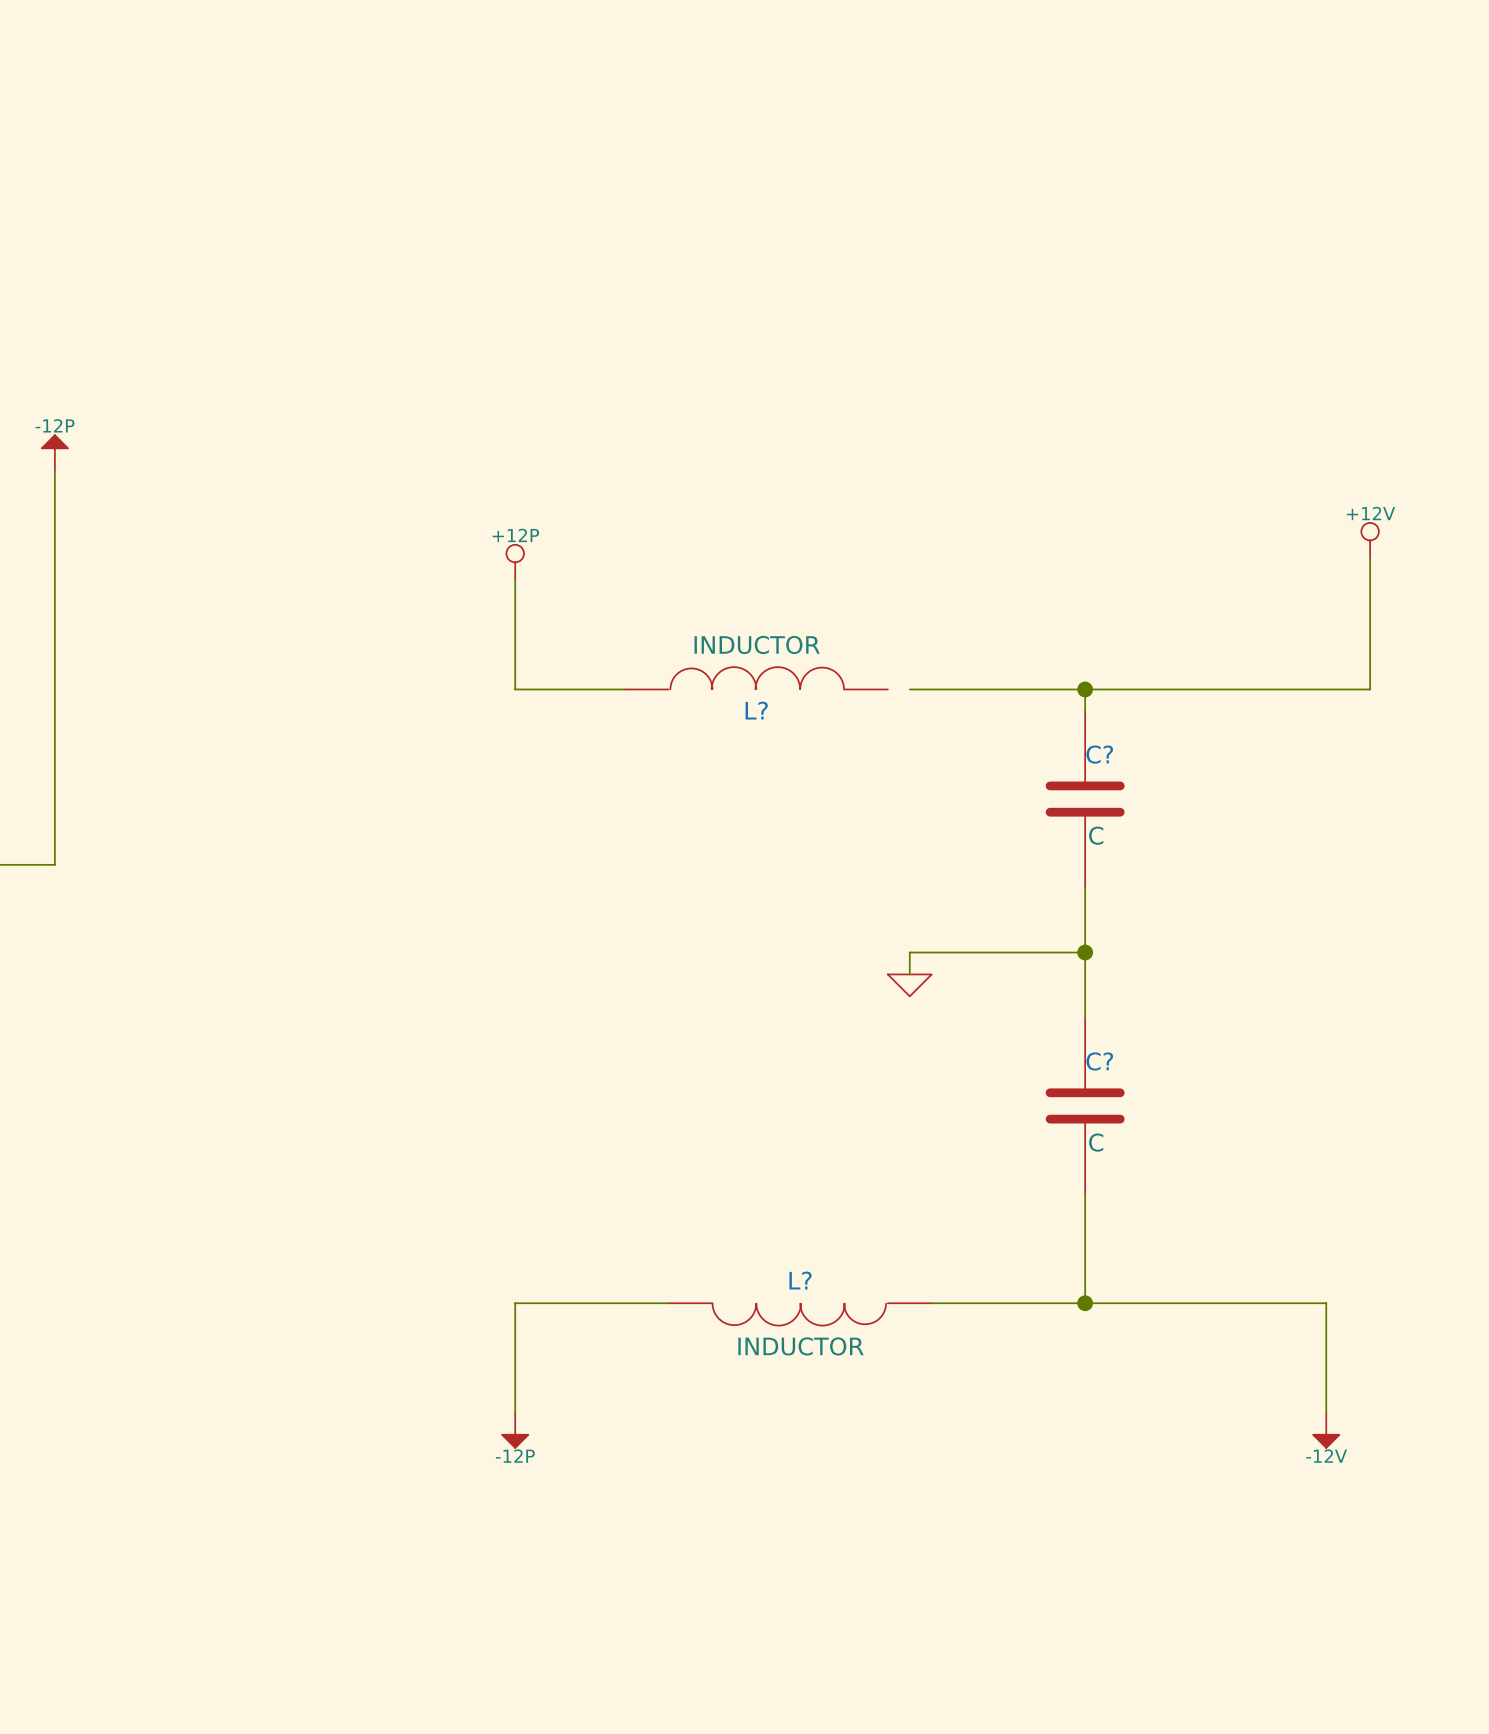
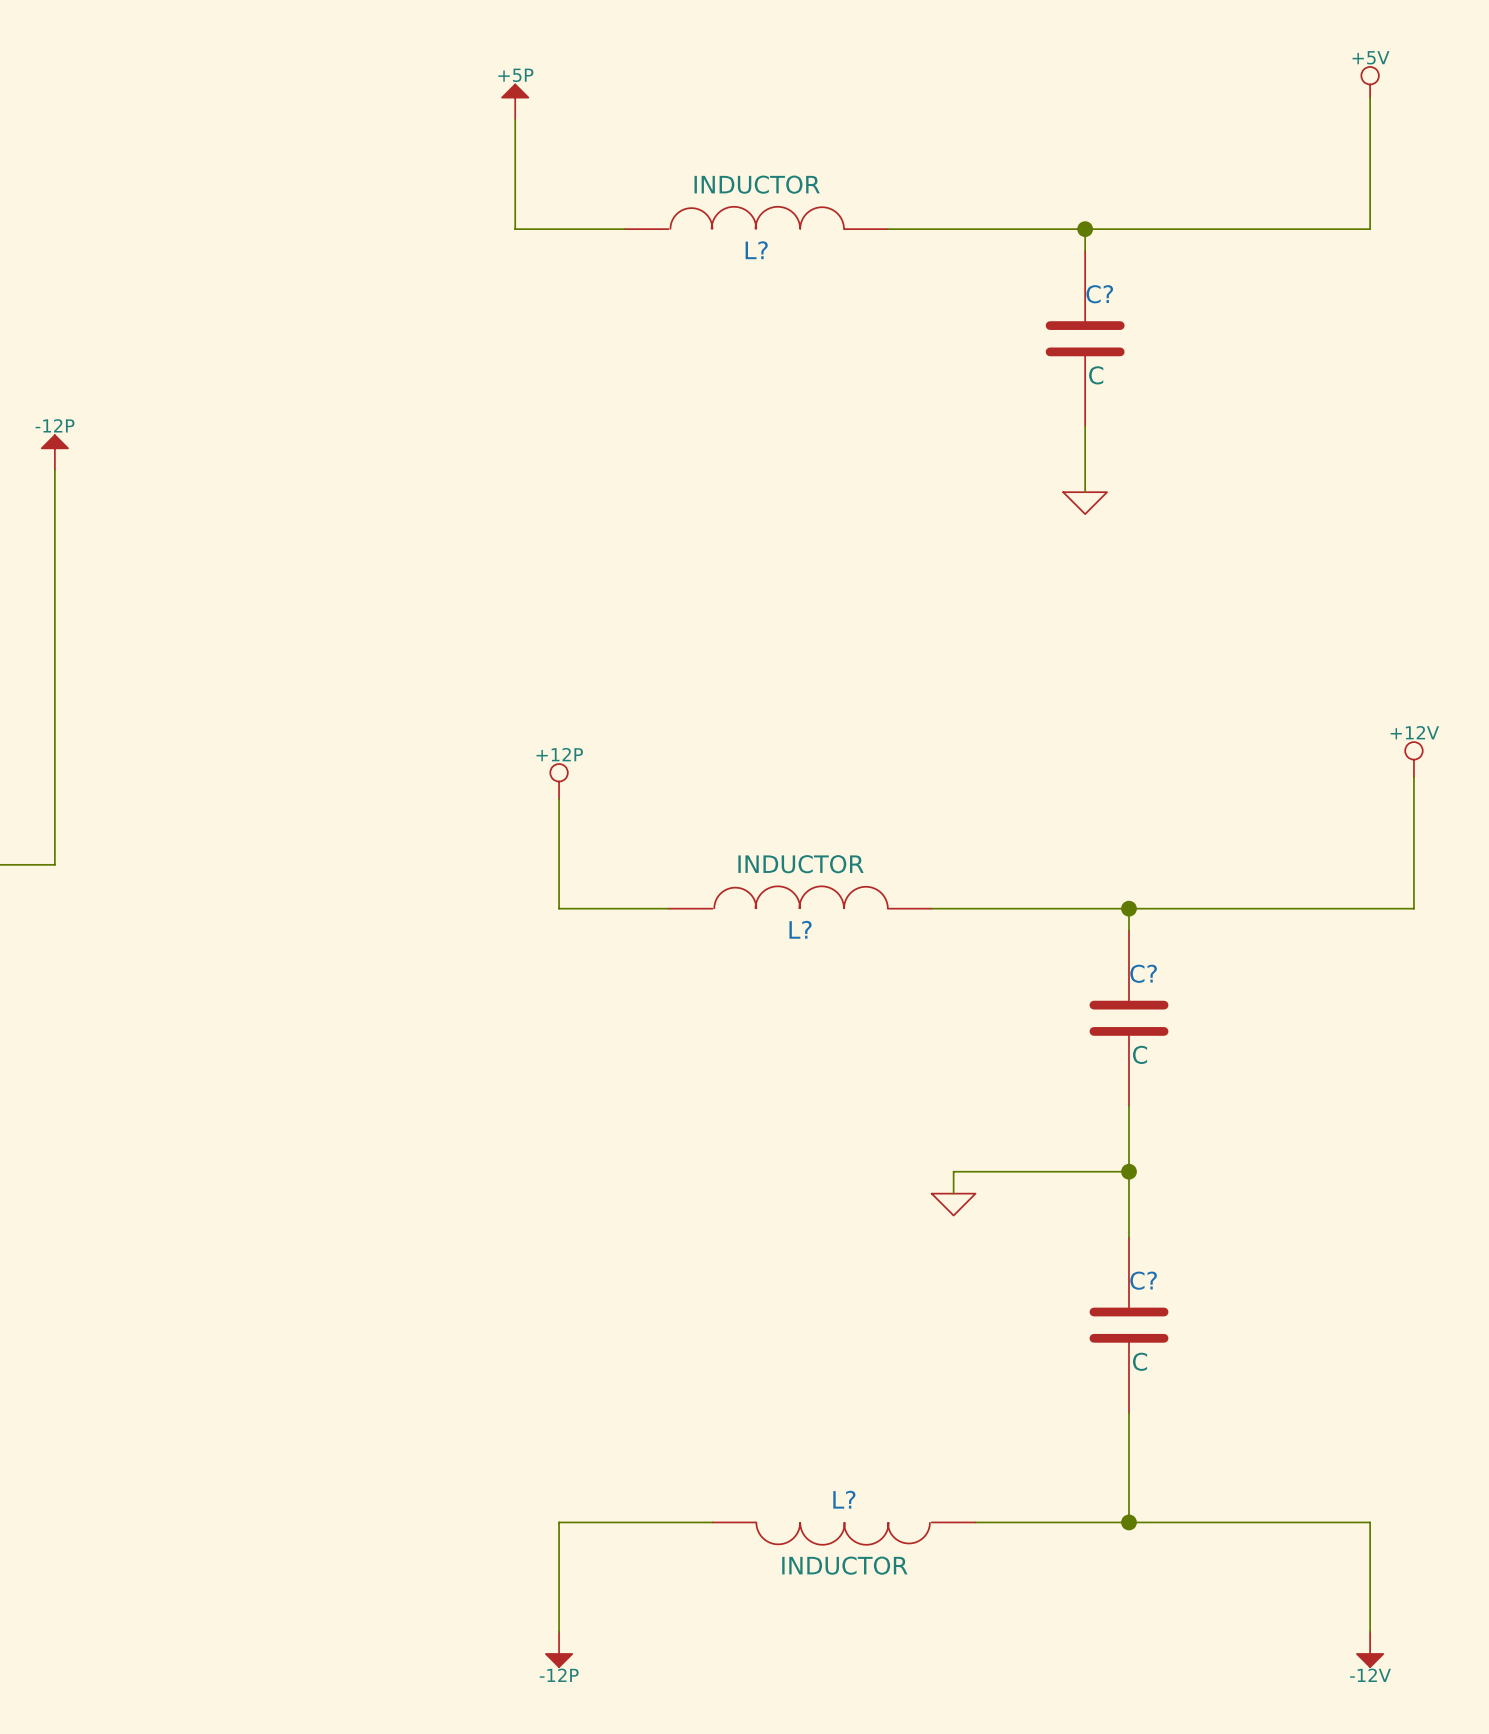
power symbol: none -> +5V (1370, 82)
wire: none -> (1370, 97) (1370, 229) (887, 229)
power symbol: none -> +5P (515, 101)
wire: none -> (515, 119) (515, 229) (624, 229)
L?: none -> INDUCTOR (756, 217)
wire: none -> (1085, 229) (1085, 251)
junction: none -> (1085, 229)
C?: none -> C (1085, 338)
wire: none -> (1085, 426) (1085, 492)
power symbol: none -> (1085, 503)
power symbol position: +12V (1370, 540) -> +12V (1413, 759)
wire: (1370, 557) (1370, 689) (909, 689) -> none
power symbol position: +12P (515, 562) -> +12P (559, 781)
wire: (515, 579) (515, 689) (624, 689) -> (559, 799) (559, 908) (668, 908)
L?: INDUCTOR (756, 678) -> none
wire: (1085, 689) (1085, 711) -> (1128, 908) (1128, 930)
junction: (1085, 689) -> none
wire: none -> (1413, 777) (1413, 908) (931, 908)
C?: C (1085, 799) -> none
wire: (1085, 886) (1085, 1018) -> (1128, 1105) (1128, 1237)
L?: none -> INDUCTOR (800, 897)
wire: (1085, 952) (909, 952) (909, 974) -> (1128, 1171) (953, 1171) (953, 1193)
junction position: (1085, 952) -> (1128, 908)
power symbol position: (909, 985) -> (953, 1204)
C? position: (1085, 1105) -> (1128, 1018)
junction: none -> (1128, 1171)
wire: (1085, 1193) (1085, 1303) -> (1128, 1412) (1128, 1522)
wire: (668, 1303) (515, 1303) (515, 1412) -> (712, 1522) (559, 1522) (559, 1632)
wire: (931, 1303) (1326, 1303) (1326, 1412) -> (975, 1522) (1370, 1522) (1370, 1632)
junction: (1085, 1303) -> none
L?: INDUCTOR (800, 1314) -> none
C?: none -> C (1128, 1325)
power symbol position: -12P (515, 1430) -> -12P (559, 1649)
power symbol position: -12V (1326, 1430) -> -12V (1370, 1649)
junction: none -> (1128, 1522)
L?: none -> INDUCTOR (844, 1533)

